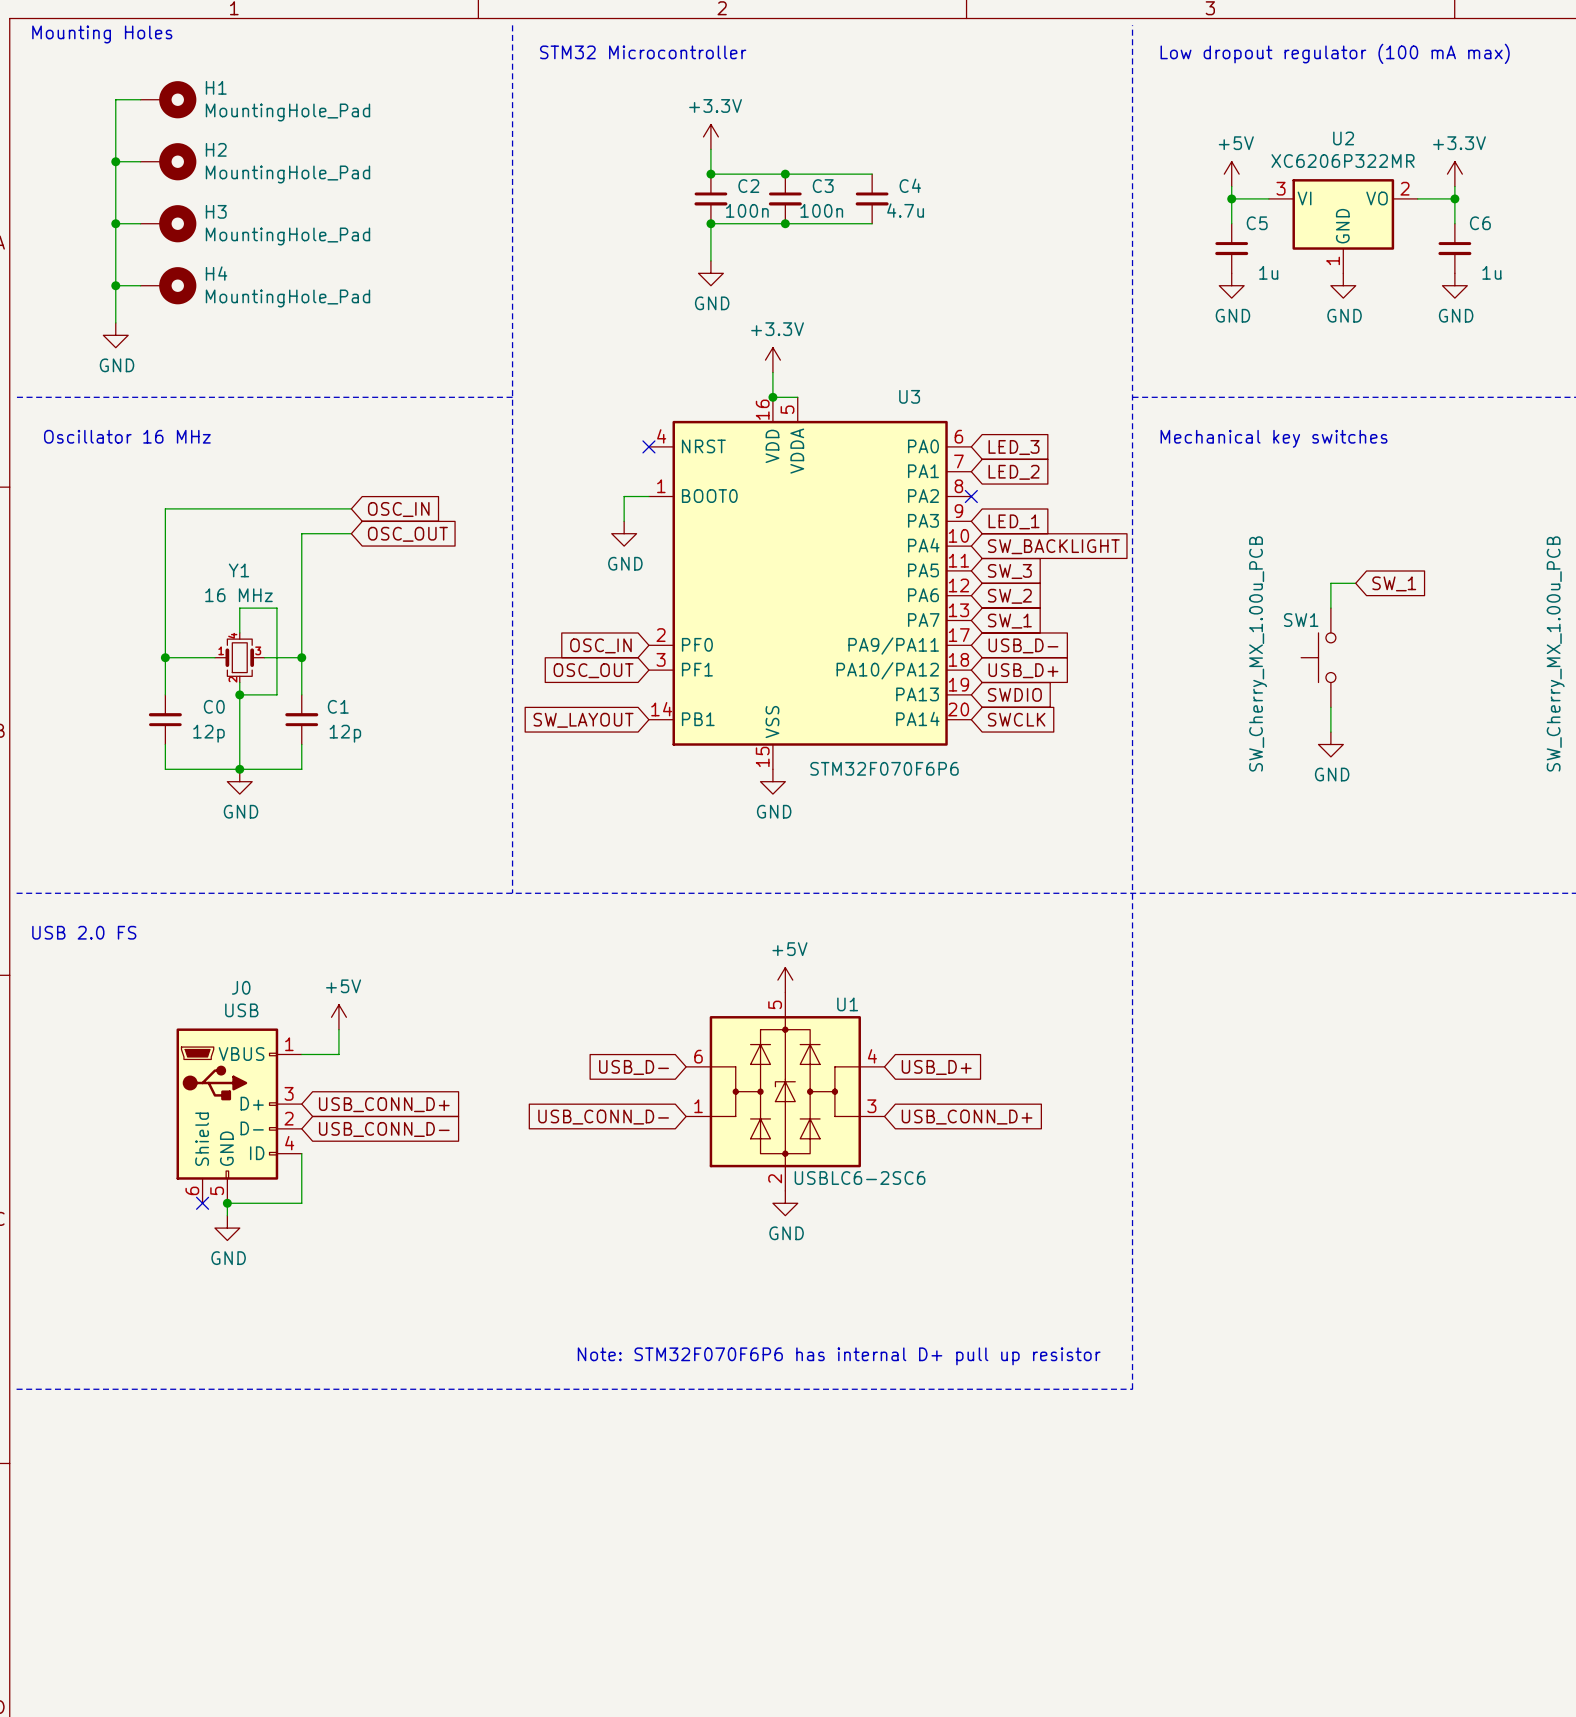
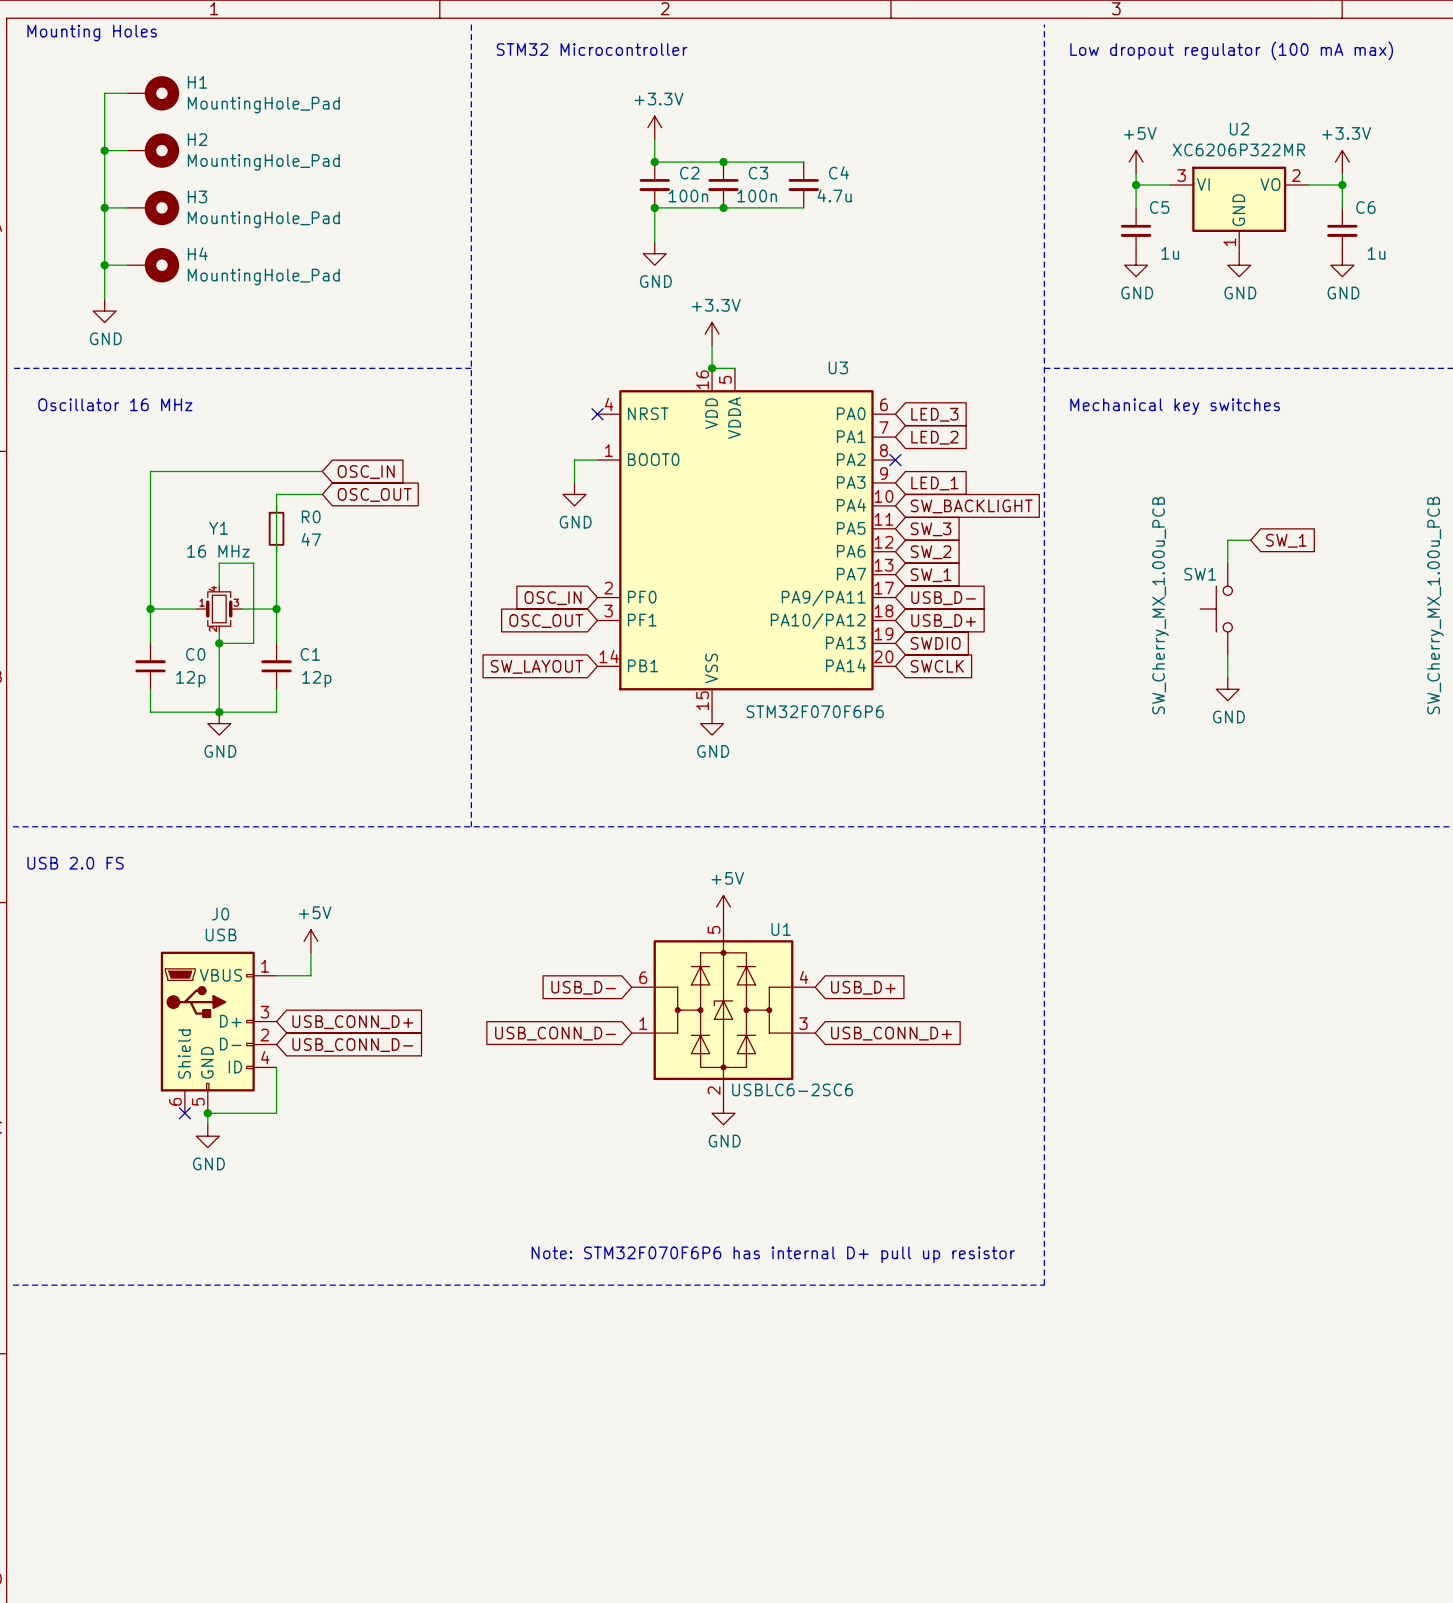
R0: none -> 47 (276, 528)

